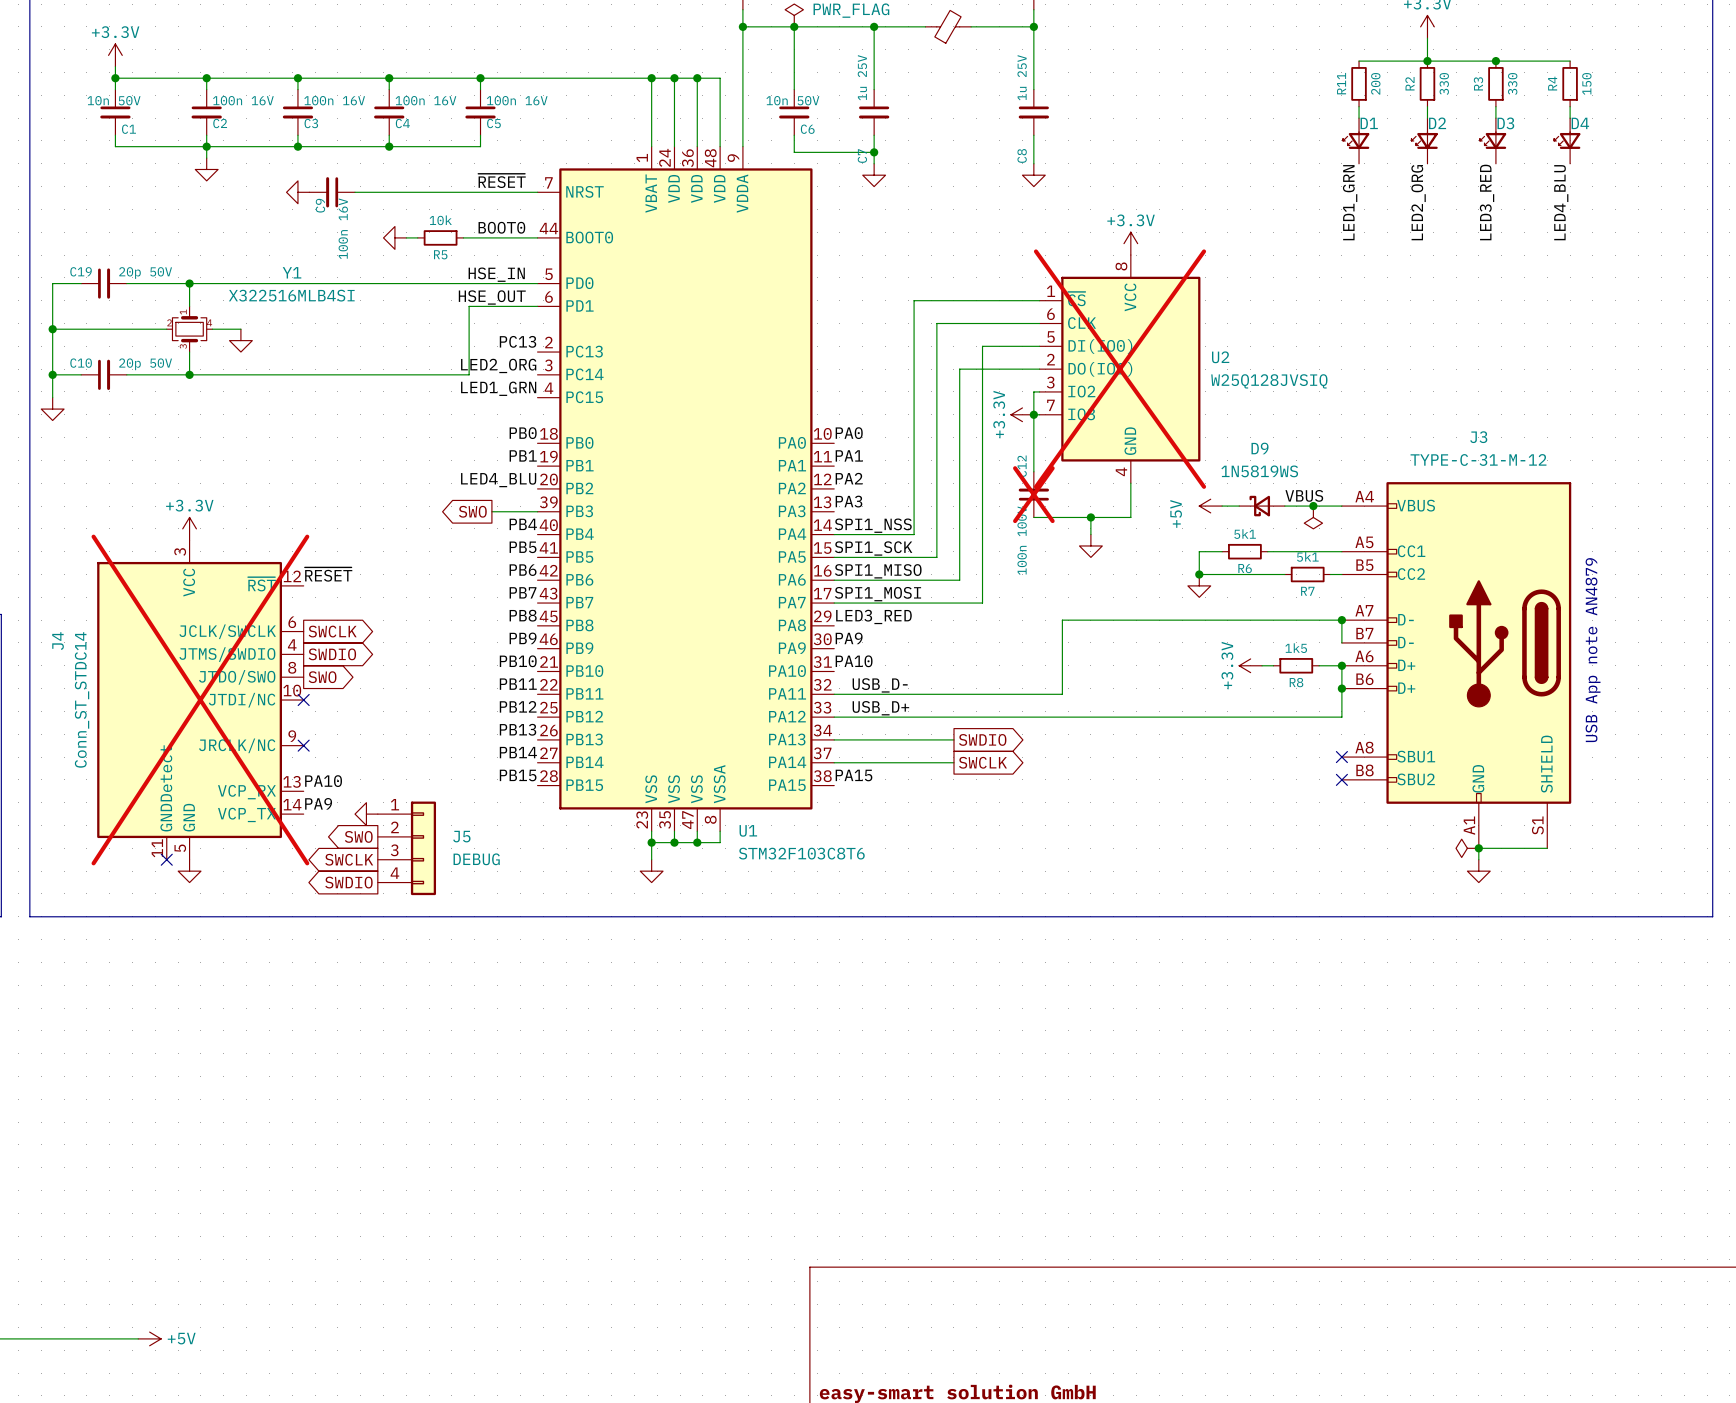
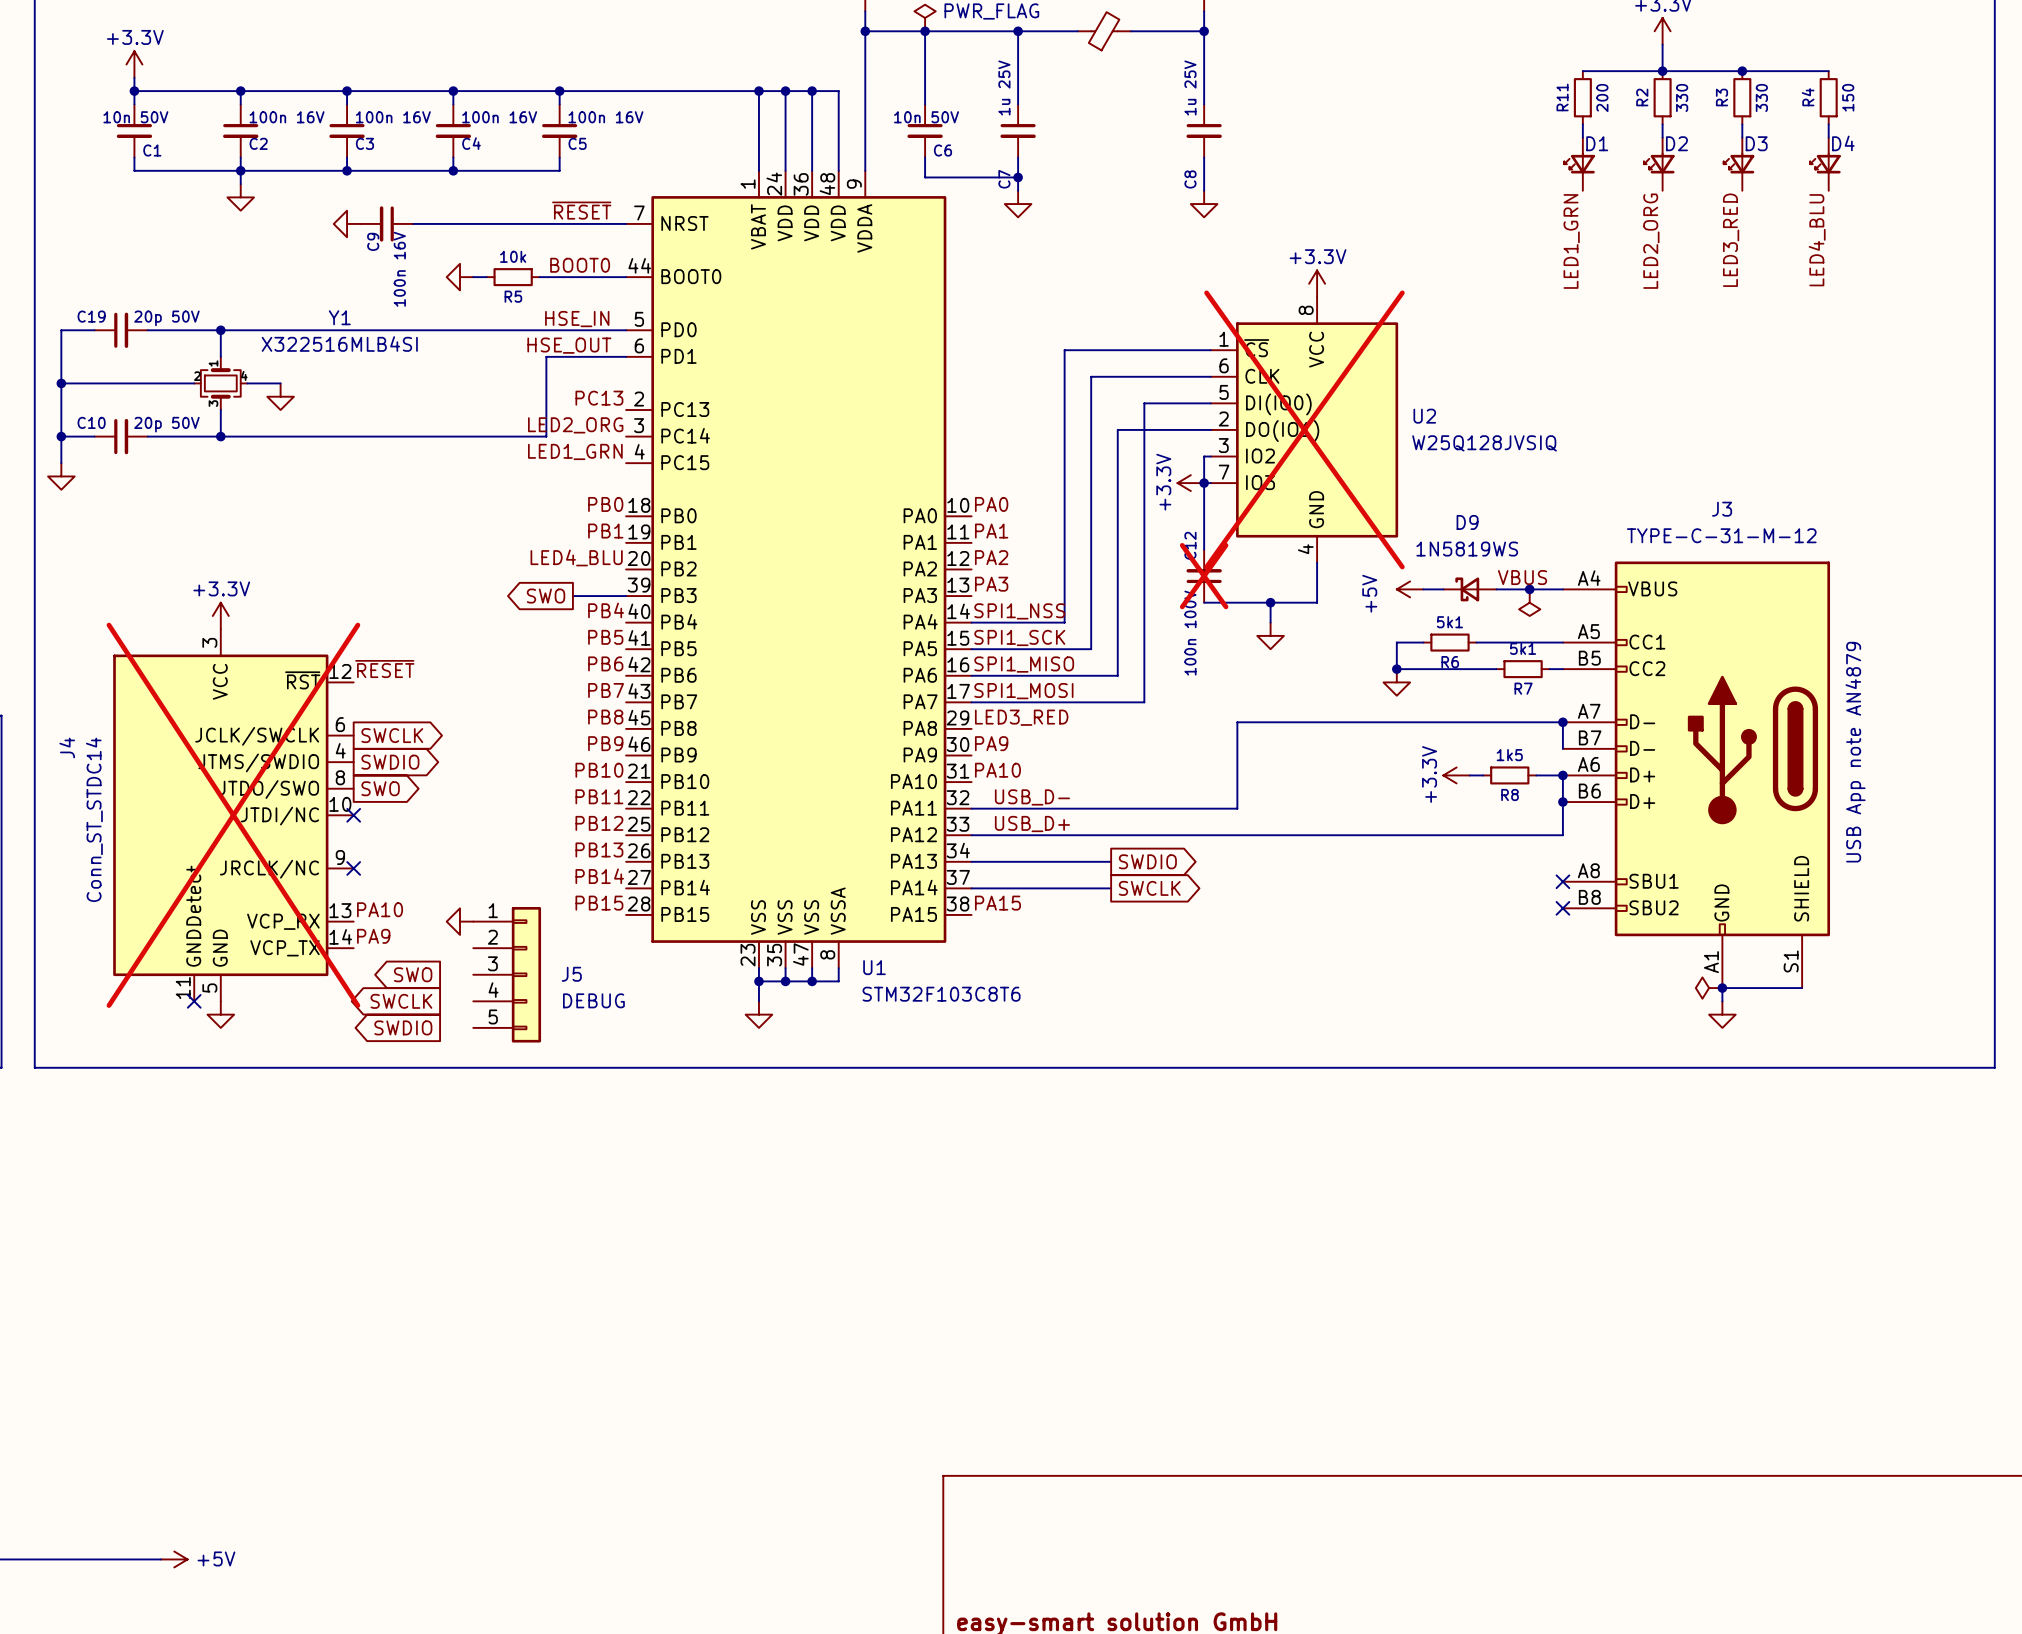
J5 symbol: [377, 801, 437, 896] -> [473, 906, 542, 1043]
power symbol position: (366, 814) -> (459, 921)

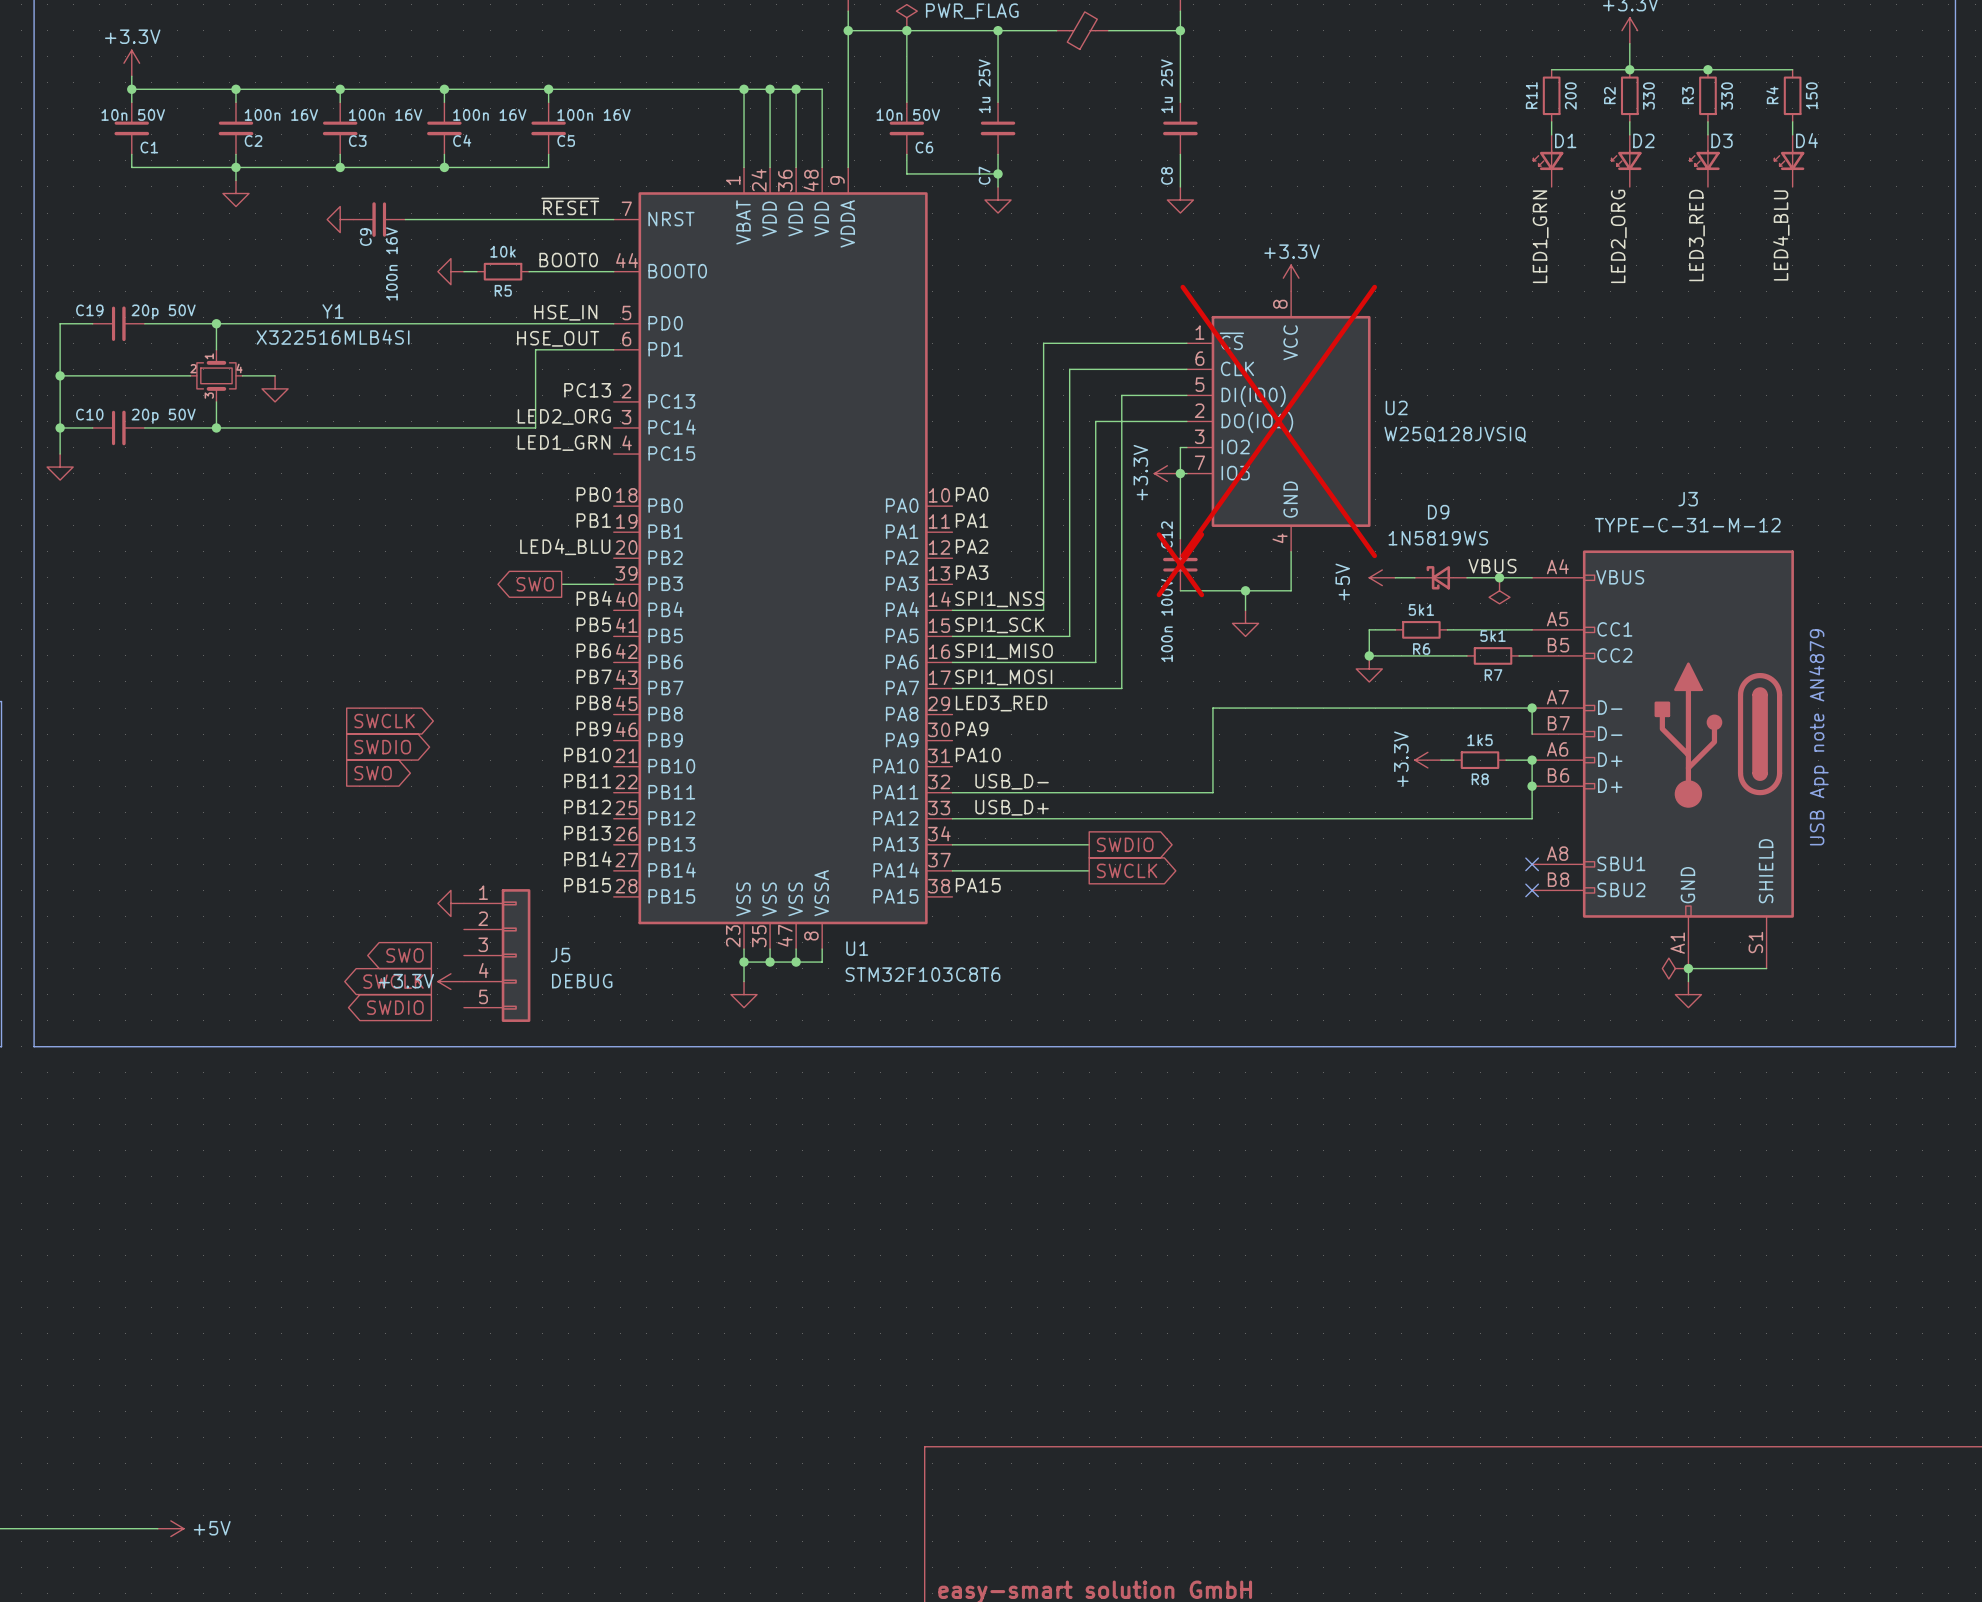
power symbol: +3.3V (220, 615) -> none
label: ~{RESET} (384, 669) -> none
J4: Conn_ST_STDC14 (233, 815) -> none
no-connect mark: (353, 815) -> none
no-connect mark: (353, 868) -> none
label: PA10 (380, 909) -> none
label: PA9 (373, 936) -> none
no-connect mark: (194, 1001) -> none
power symbol: none -> +3.3V (450, 981)
power symbol: (220, 1014) -> none

